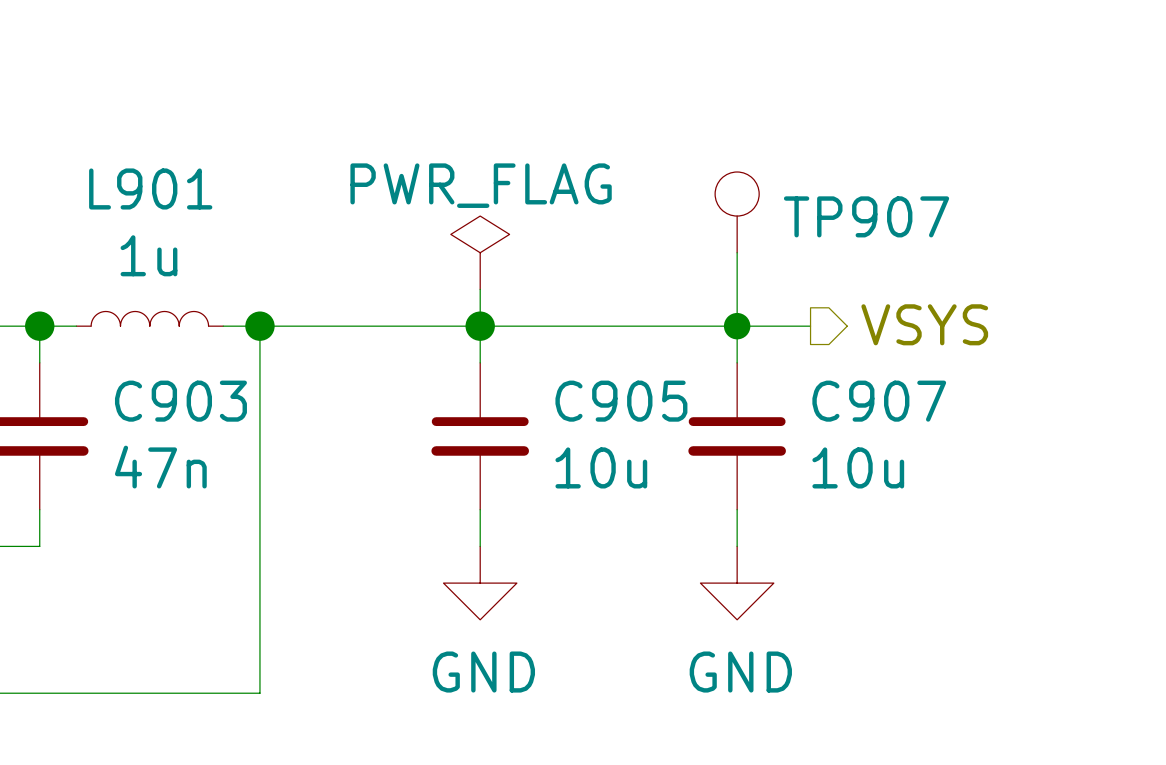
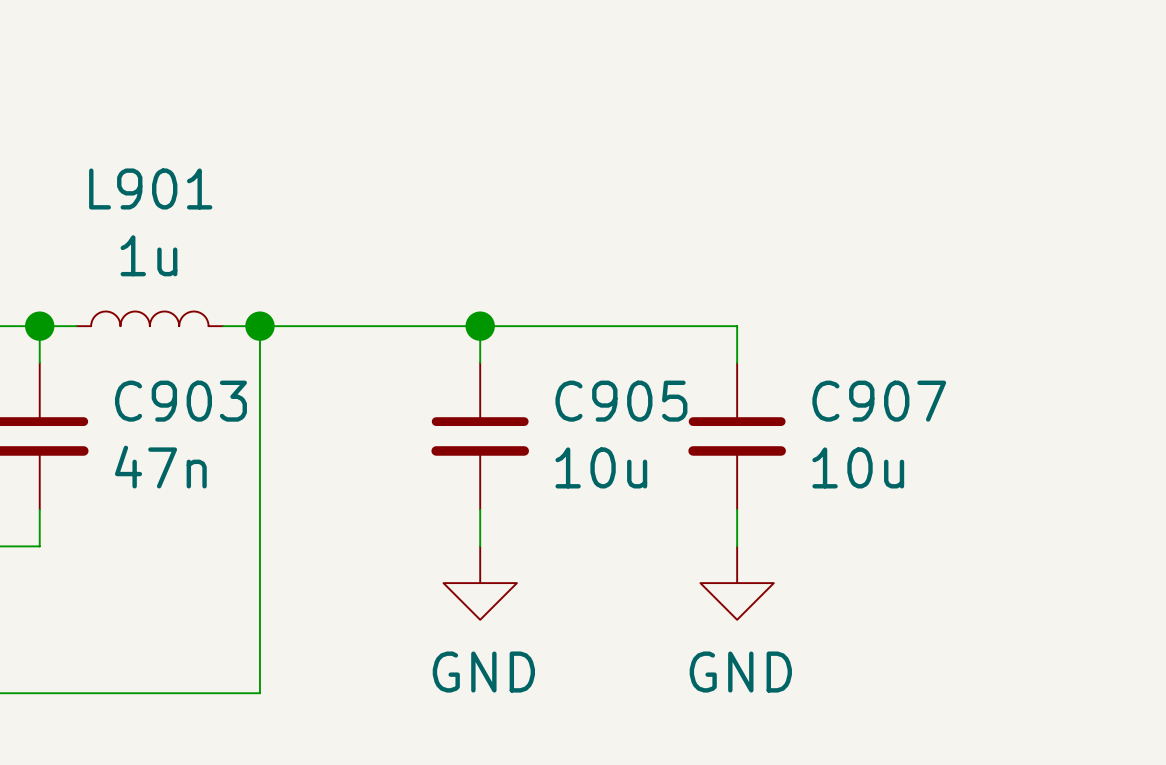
TP907: (737, 212) -> none
power symbol: PWR_FLAG (480, 252) -> none
wire: (737, 252) (737, 326) (810, 326) -> none
wire: (480, 289) (480, 326) -> none
hierarchical label: VSYS (924, 324) -> none
junction: (737, 326) -> none

